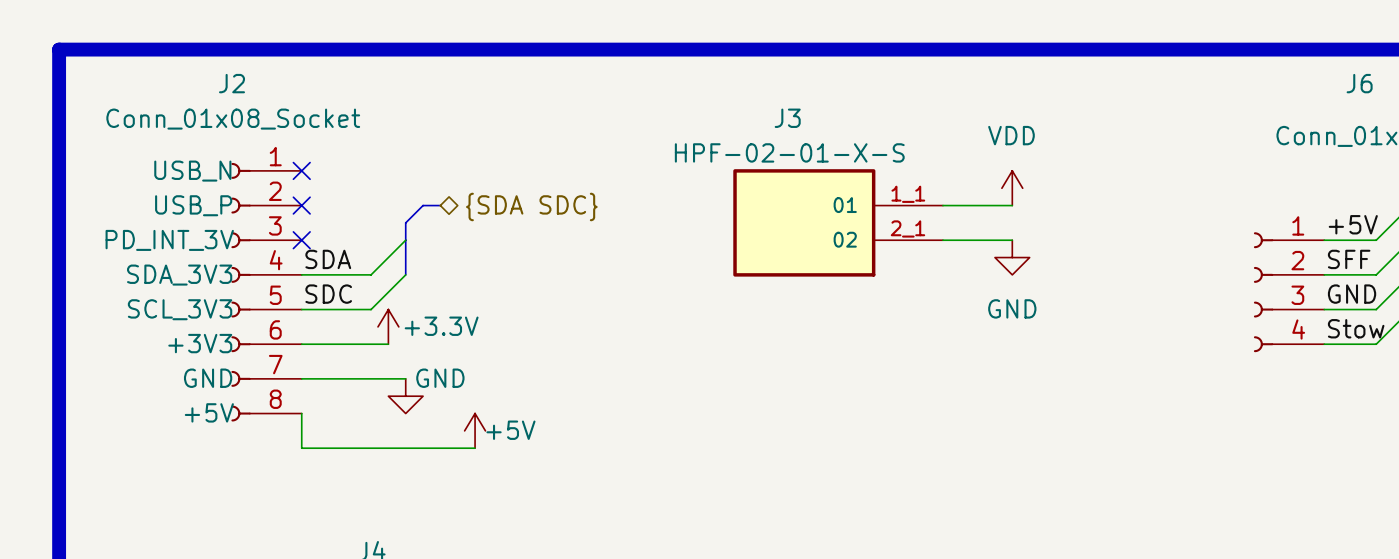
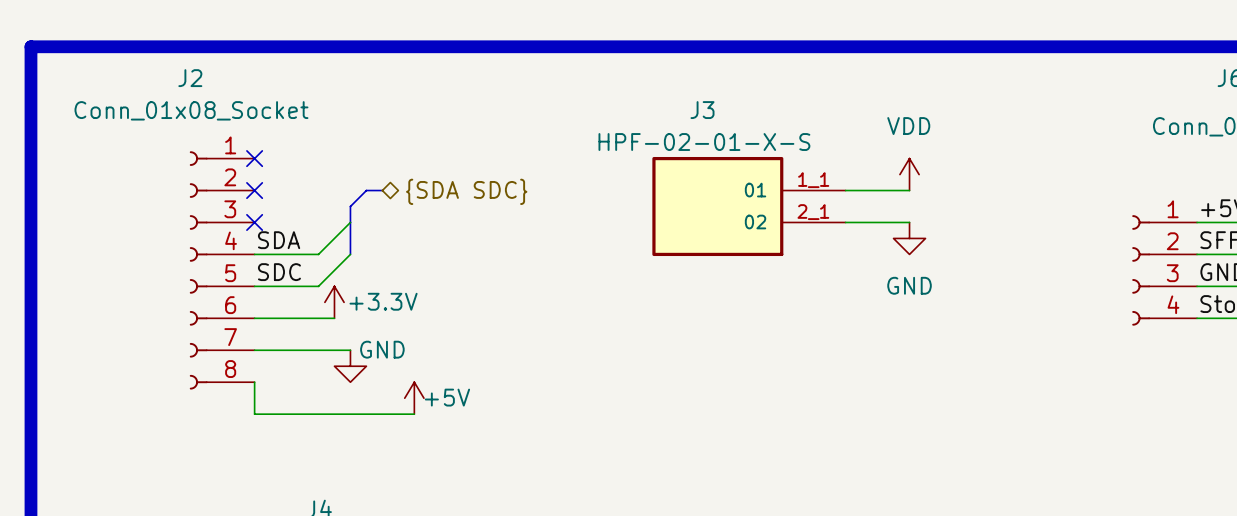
J2 pin name: USB_N (192, 171) -> none
J2 pin name: USB_P (193, 205) -> none
J2 pin name: PD_INT_3V (169, 240) -> none
J2 pin name: SDA_3V3 (179, 275) -> none
J2 pin name: SCL_3V3 (180, 309) -> none
J2 pin name: +3V3 (200, 343) -> none
J2 pin name: GND (208, 378) -> none
J2 pin name: +5V (209, 412) -> none

